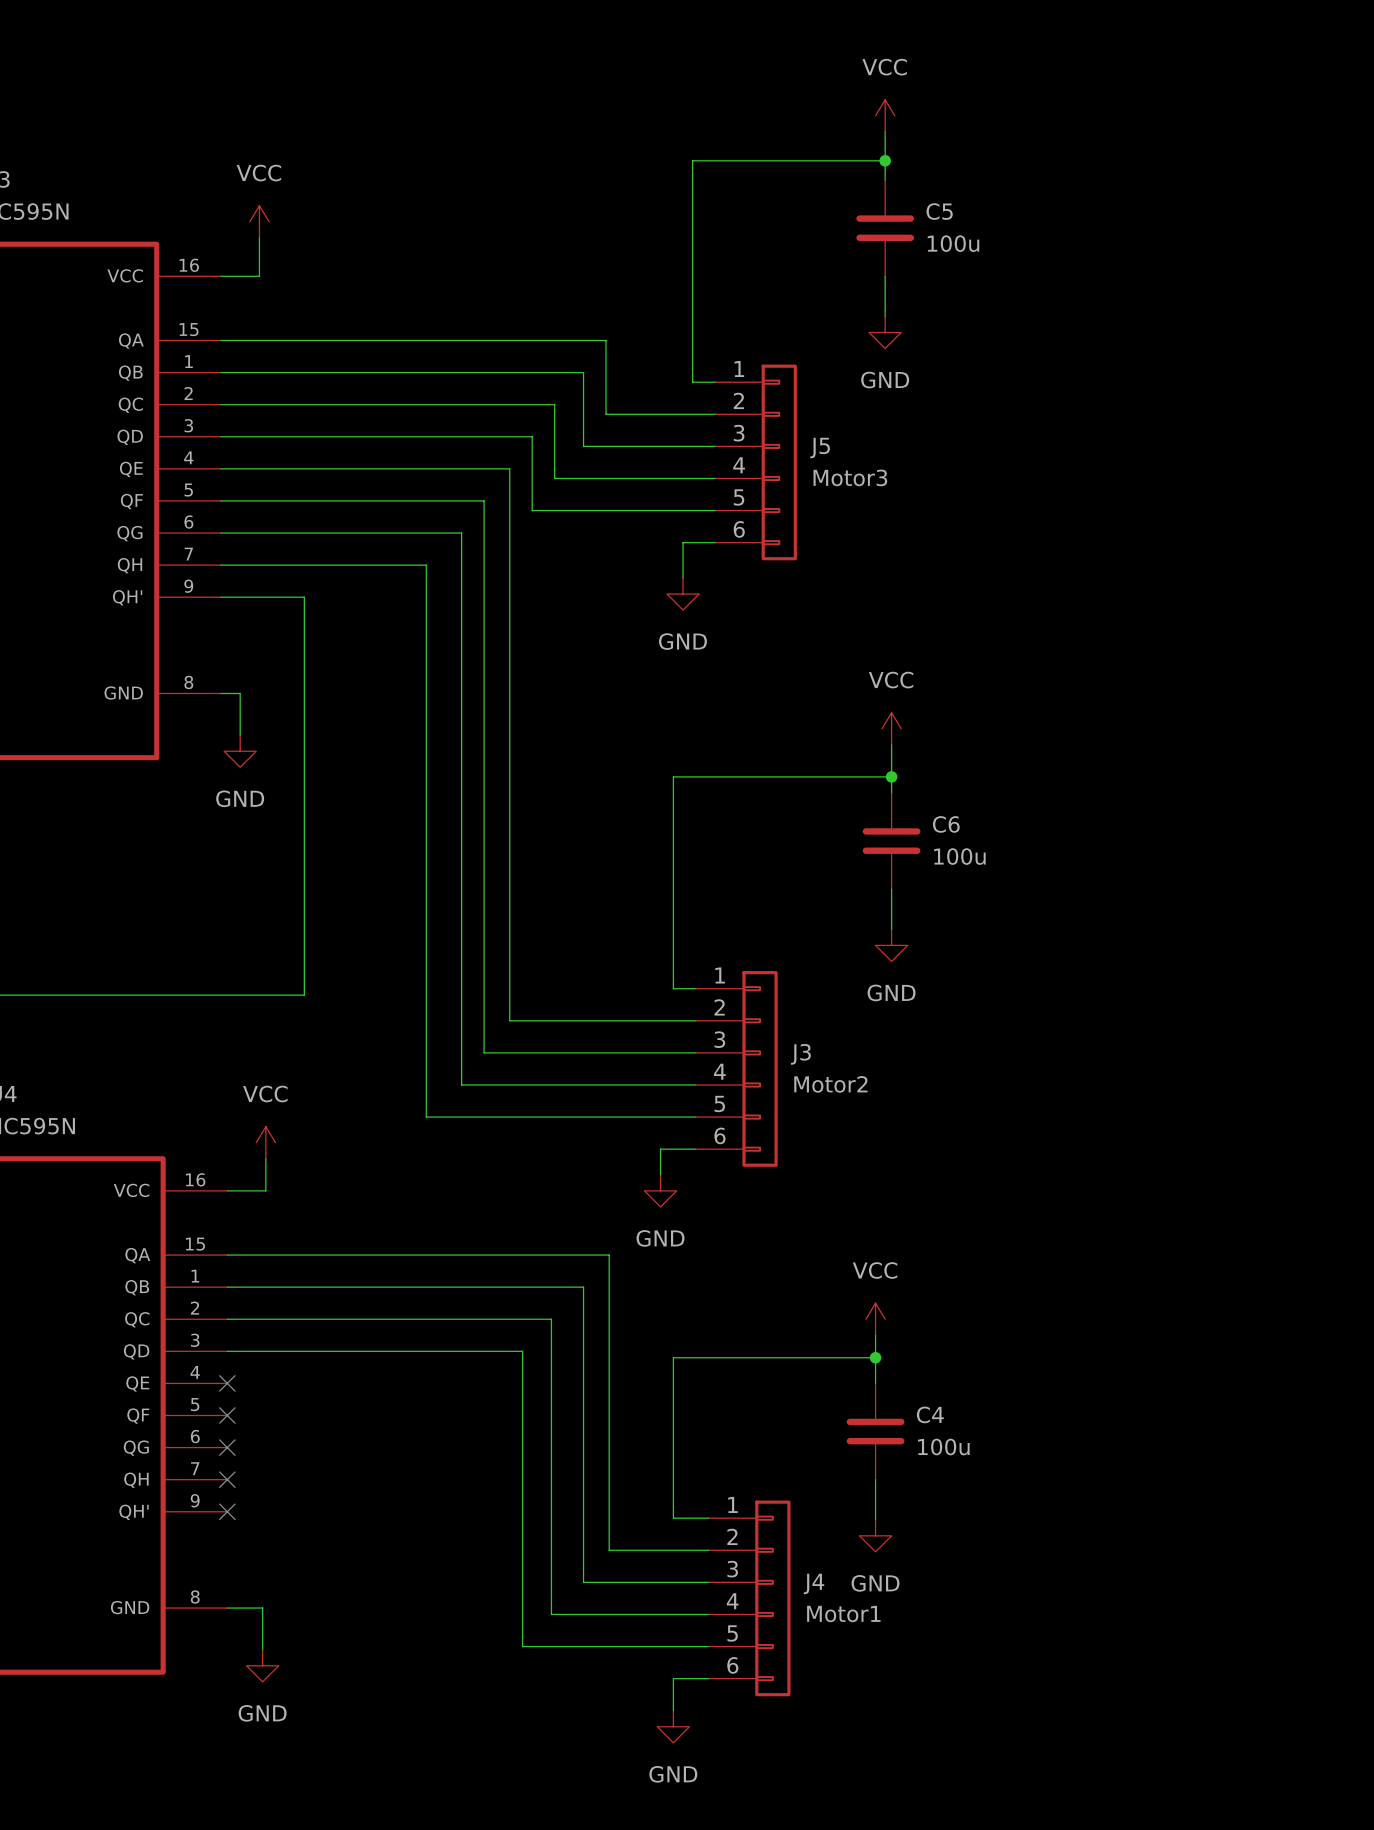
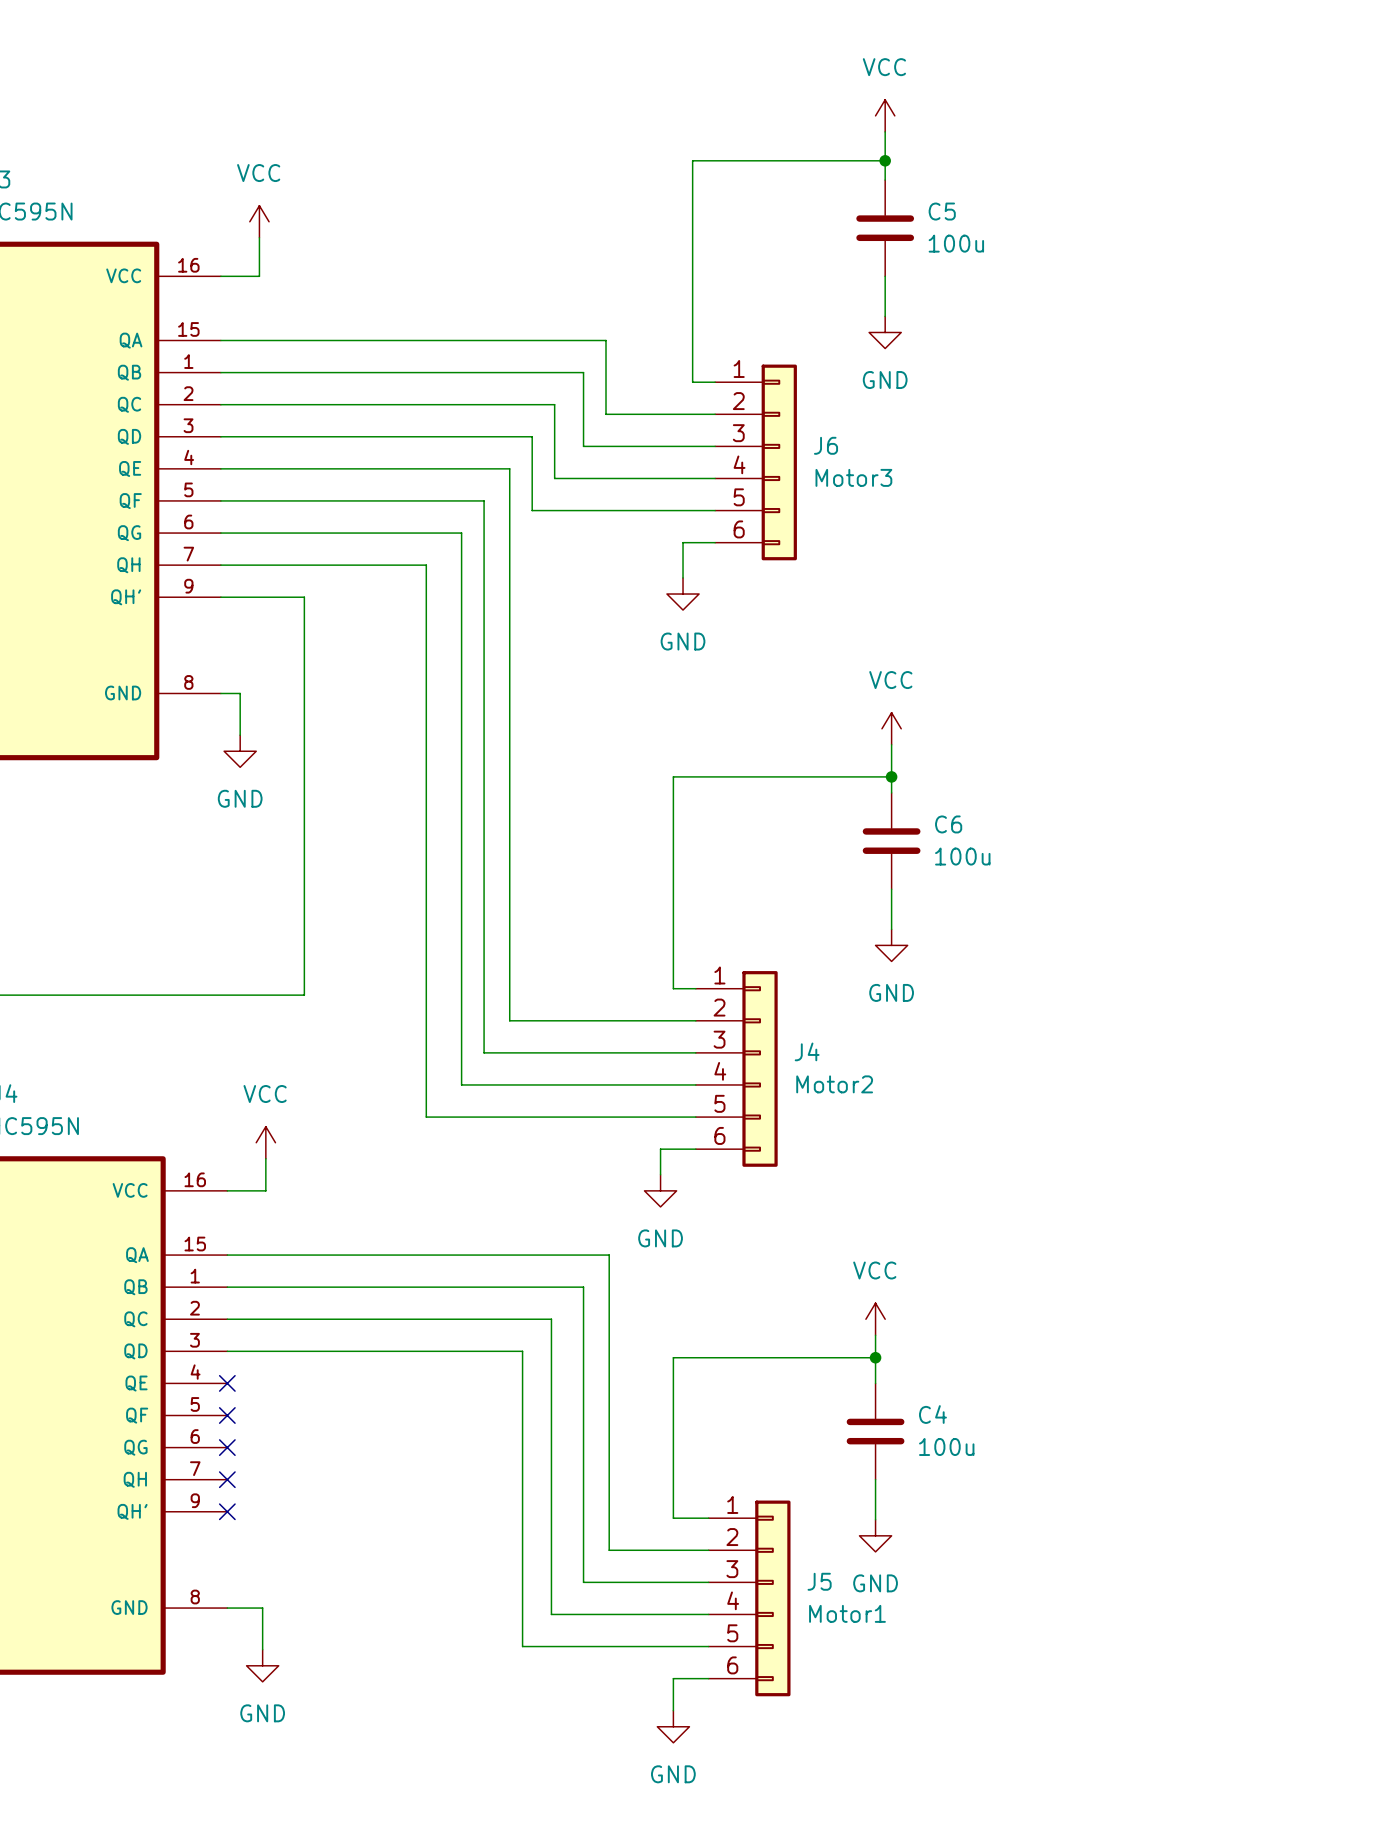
J5 name: J5 (820, 448) -> J6 (826, 445)
J3 name: J3 (800, 1054) -> J4 (807, 1051)
J4 name: J4 (814, 1583) -> J5 (819, 1581)

